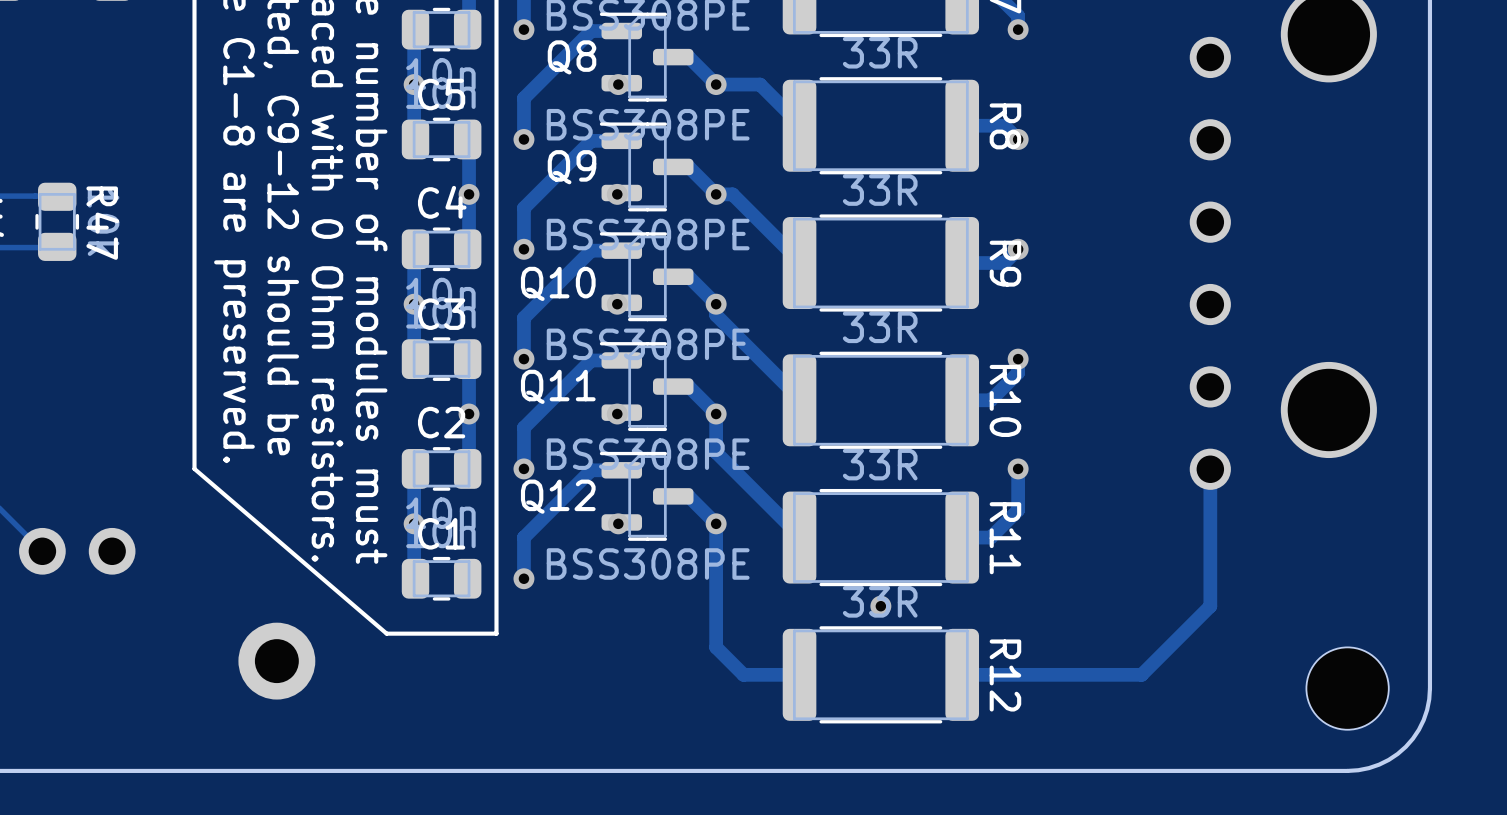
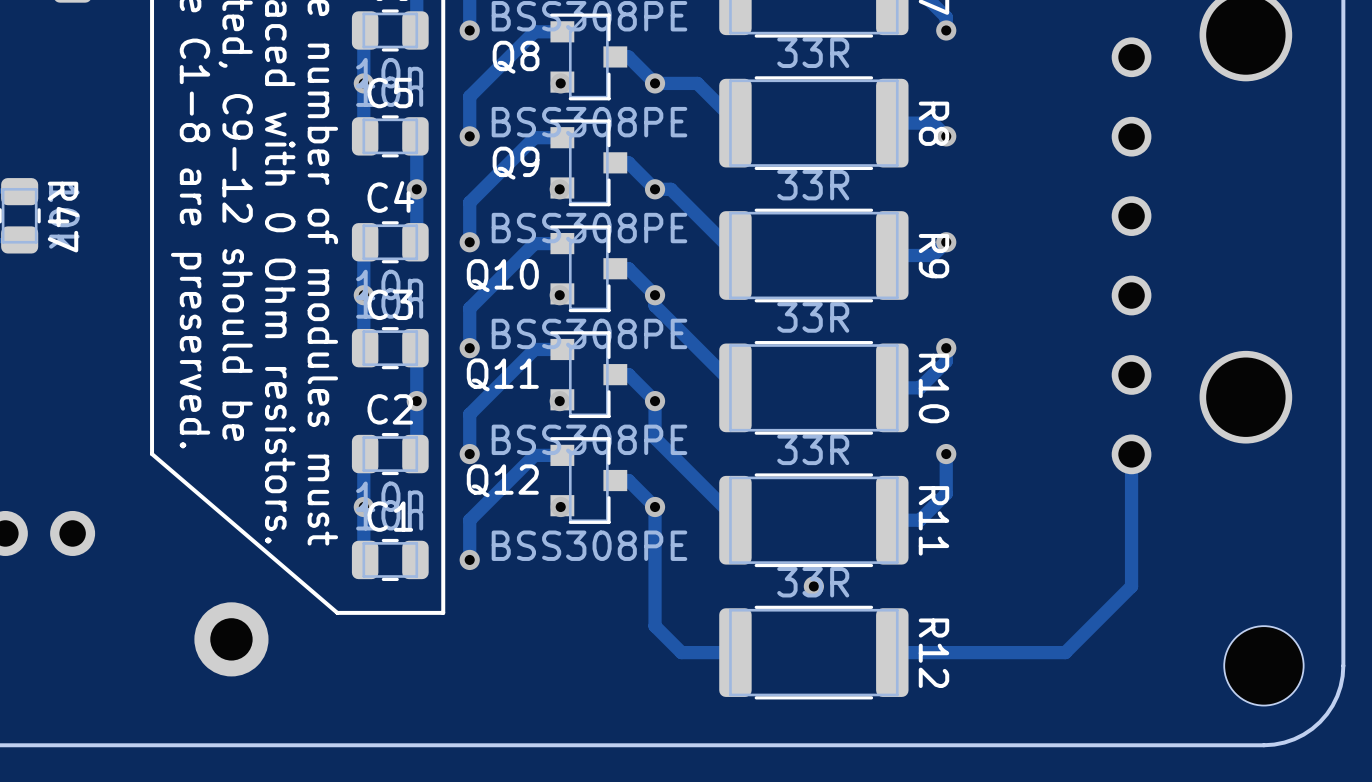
Q8 footprint: [599, 12, 694, 102] -> [550, 13, 628, 101]
Q9 footprint: [599, 122, 694, 212] -> [550, 119, 628, 207]
Q10 footprint: [599, 232, 694, 322] -> [550, 225, 628, 313]
Q11 footprint: [599, 342, 694, 432] -> [550, 331, 628, 419]
Q12 footprint: [599, 451, 694, 541] -> [550, 437, 628, 524]

